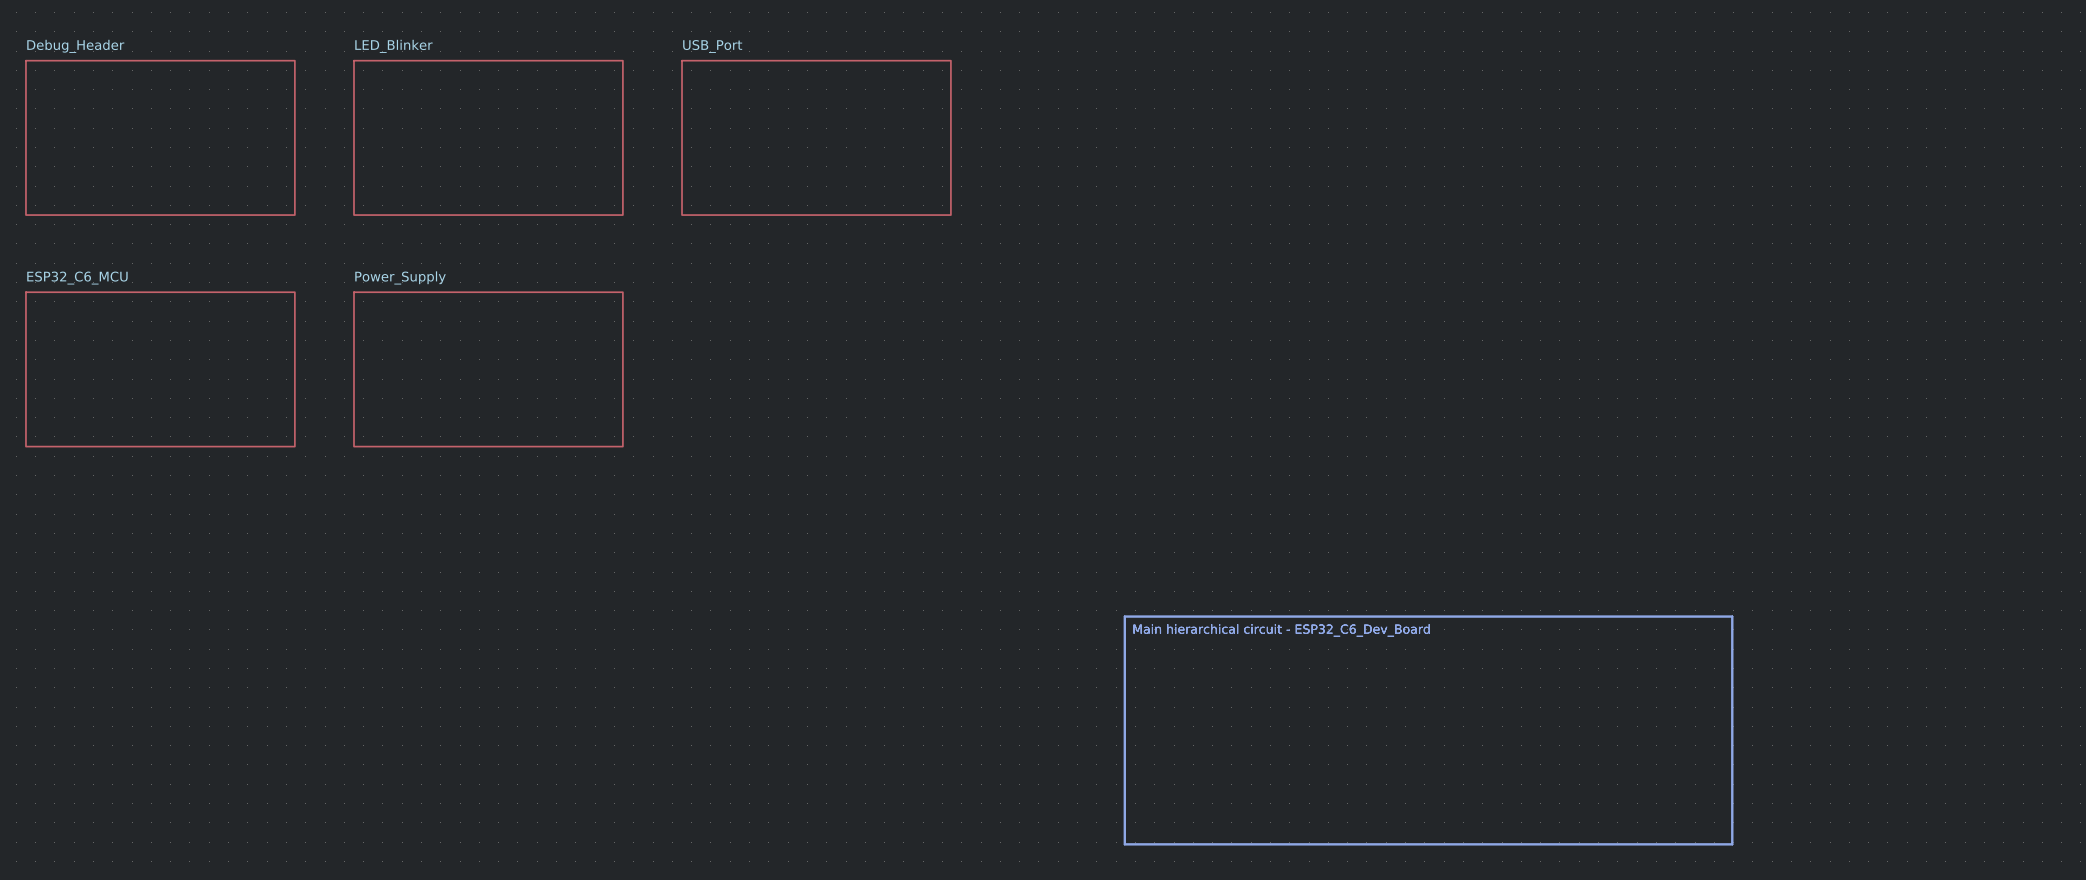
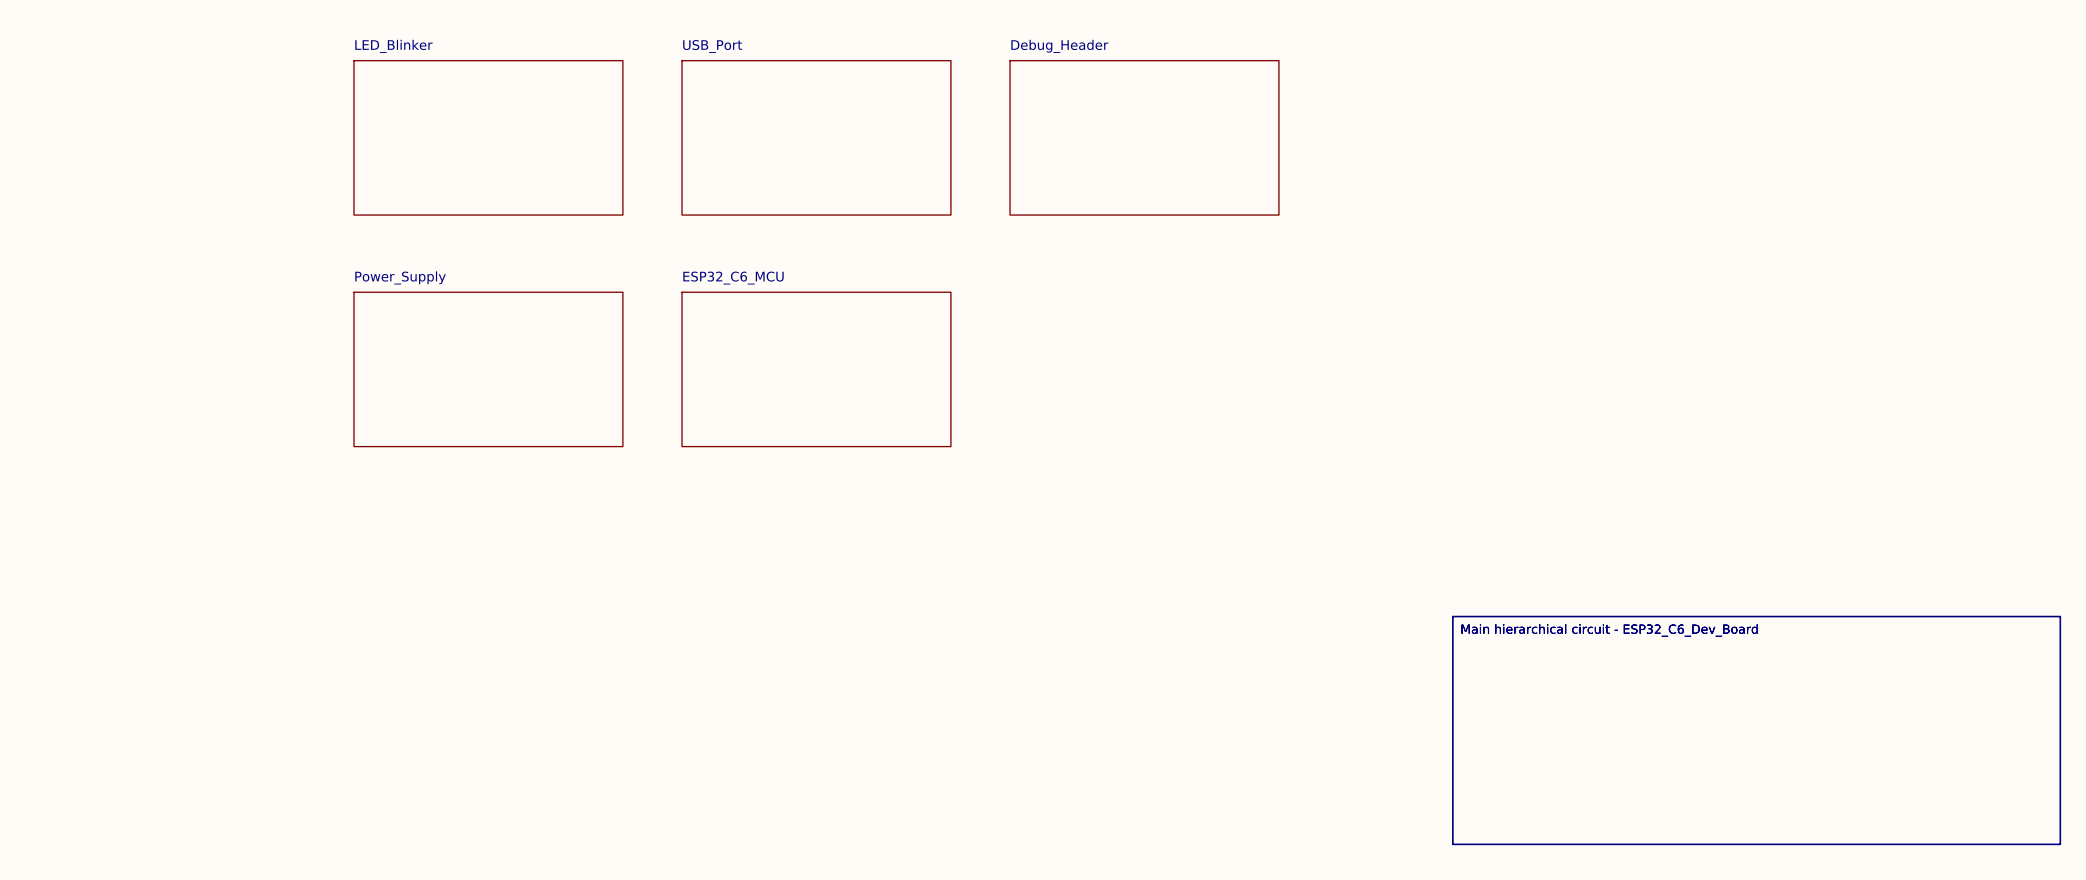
sheet Debug_Header: (160, 137) -> none
sheet Debug_Header: none -> (1144, 137)
sheet ESP32_C6_MCU position: (160, 369) -> (816, 369)
line: (1452, 616) (1124, 616) (1124, 844) (1452, 844) -> (1452, 616) (1452, 844)
line: (1732, 616) (1732, 844) -> (1732, 616) (2060, 616) (2060, 844) (1732, 844)
text: Main hierarchical circuit - ESP32_C6_Dev_Board (1281, 630) -> none
text: none -> Main hierarchical circuit - ESP32_C6_Dev_Board (1609, 630)

